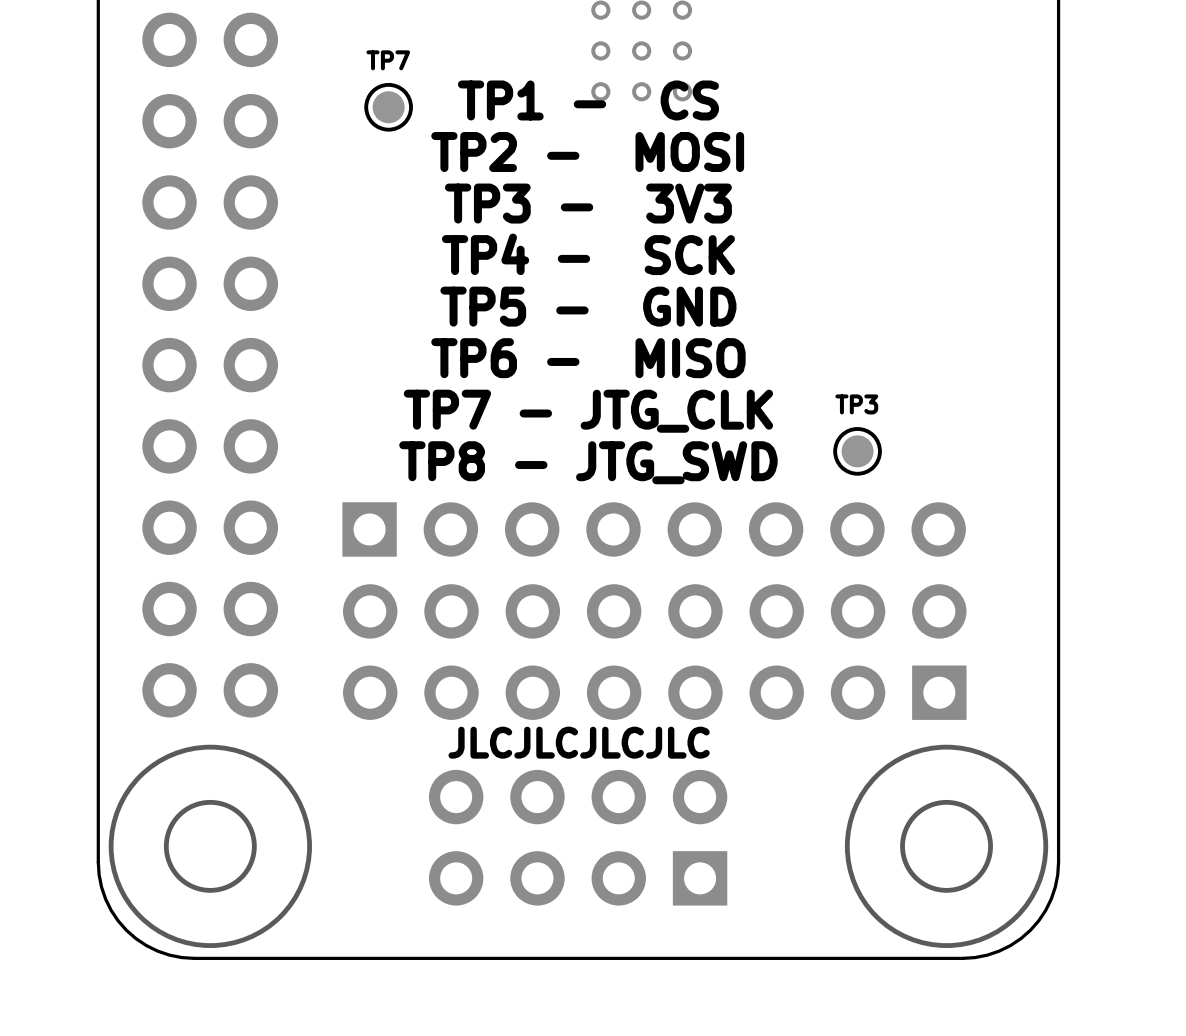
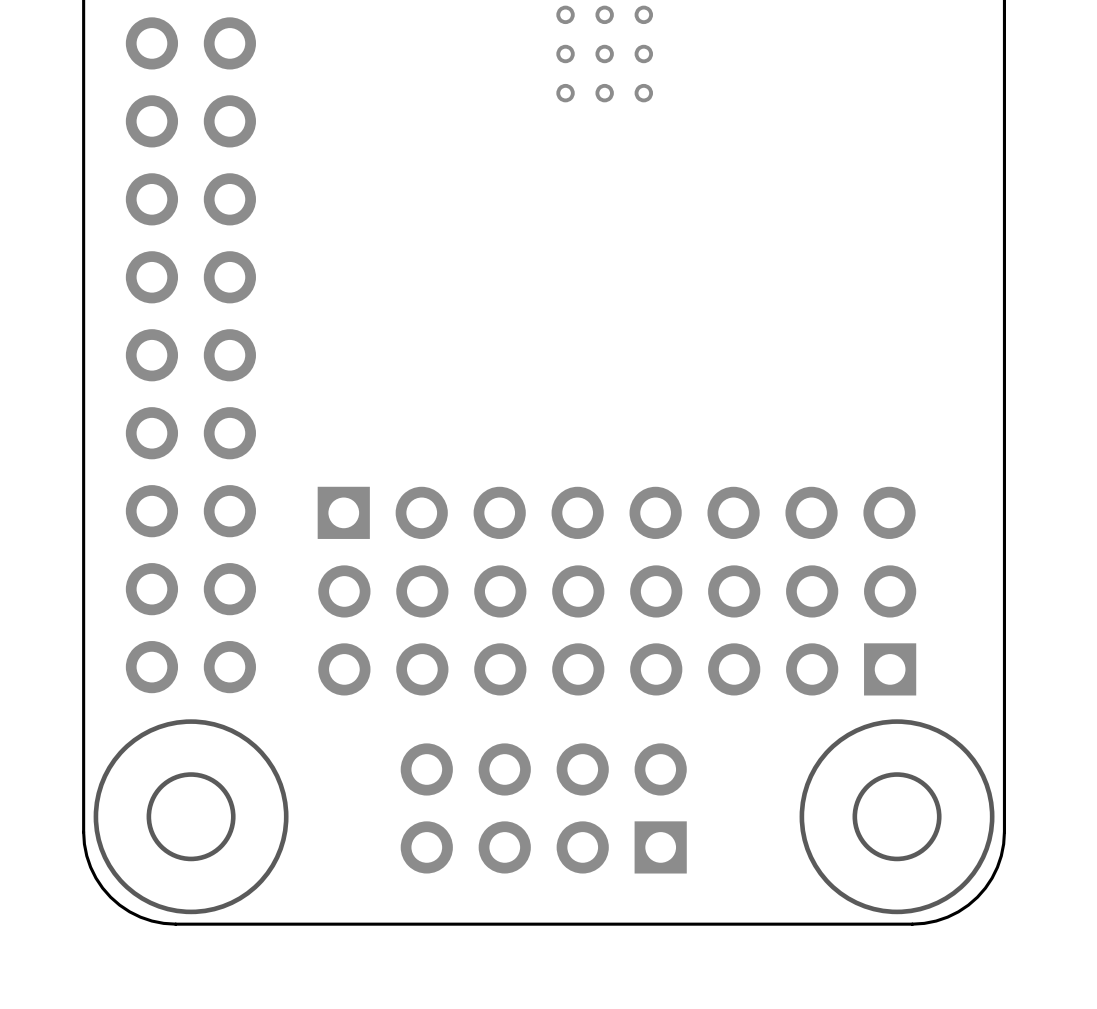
text: TP1 - CS (588, 100) -> none
TP7: (388, 107) -> none
text: TP2 - MOSI (587, 152) -> none
text: TP3 - 3V3 (588, 203) -> none
text: TP4 - SCK (588, 254) -> none
text: TP5 - GND (588, 306) -> none
text: TP6 - MISO (588, 358) -> none
text: TP7 - JTG_CLK (588, 411) -> none
TP3: (857, 451) -> none
text: TP8 - JTG_SWD (588, 462) -> none
text: JLCJLCJLCJLC (579, 742) -> none

